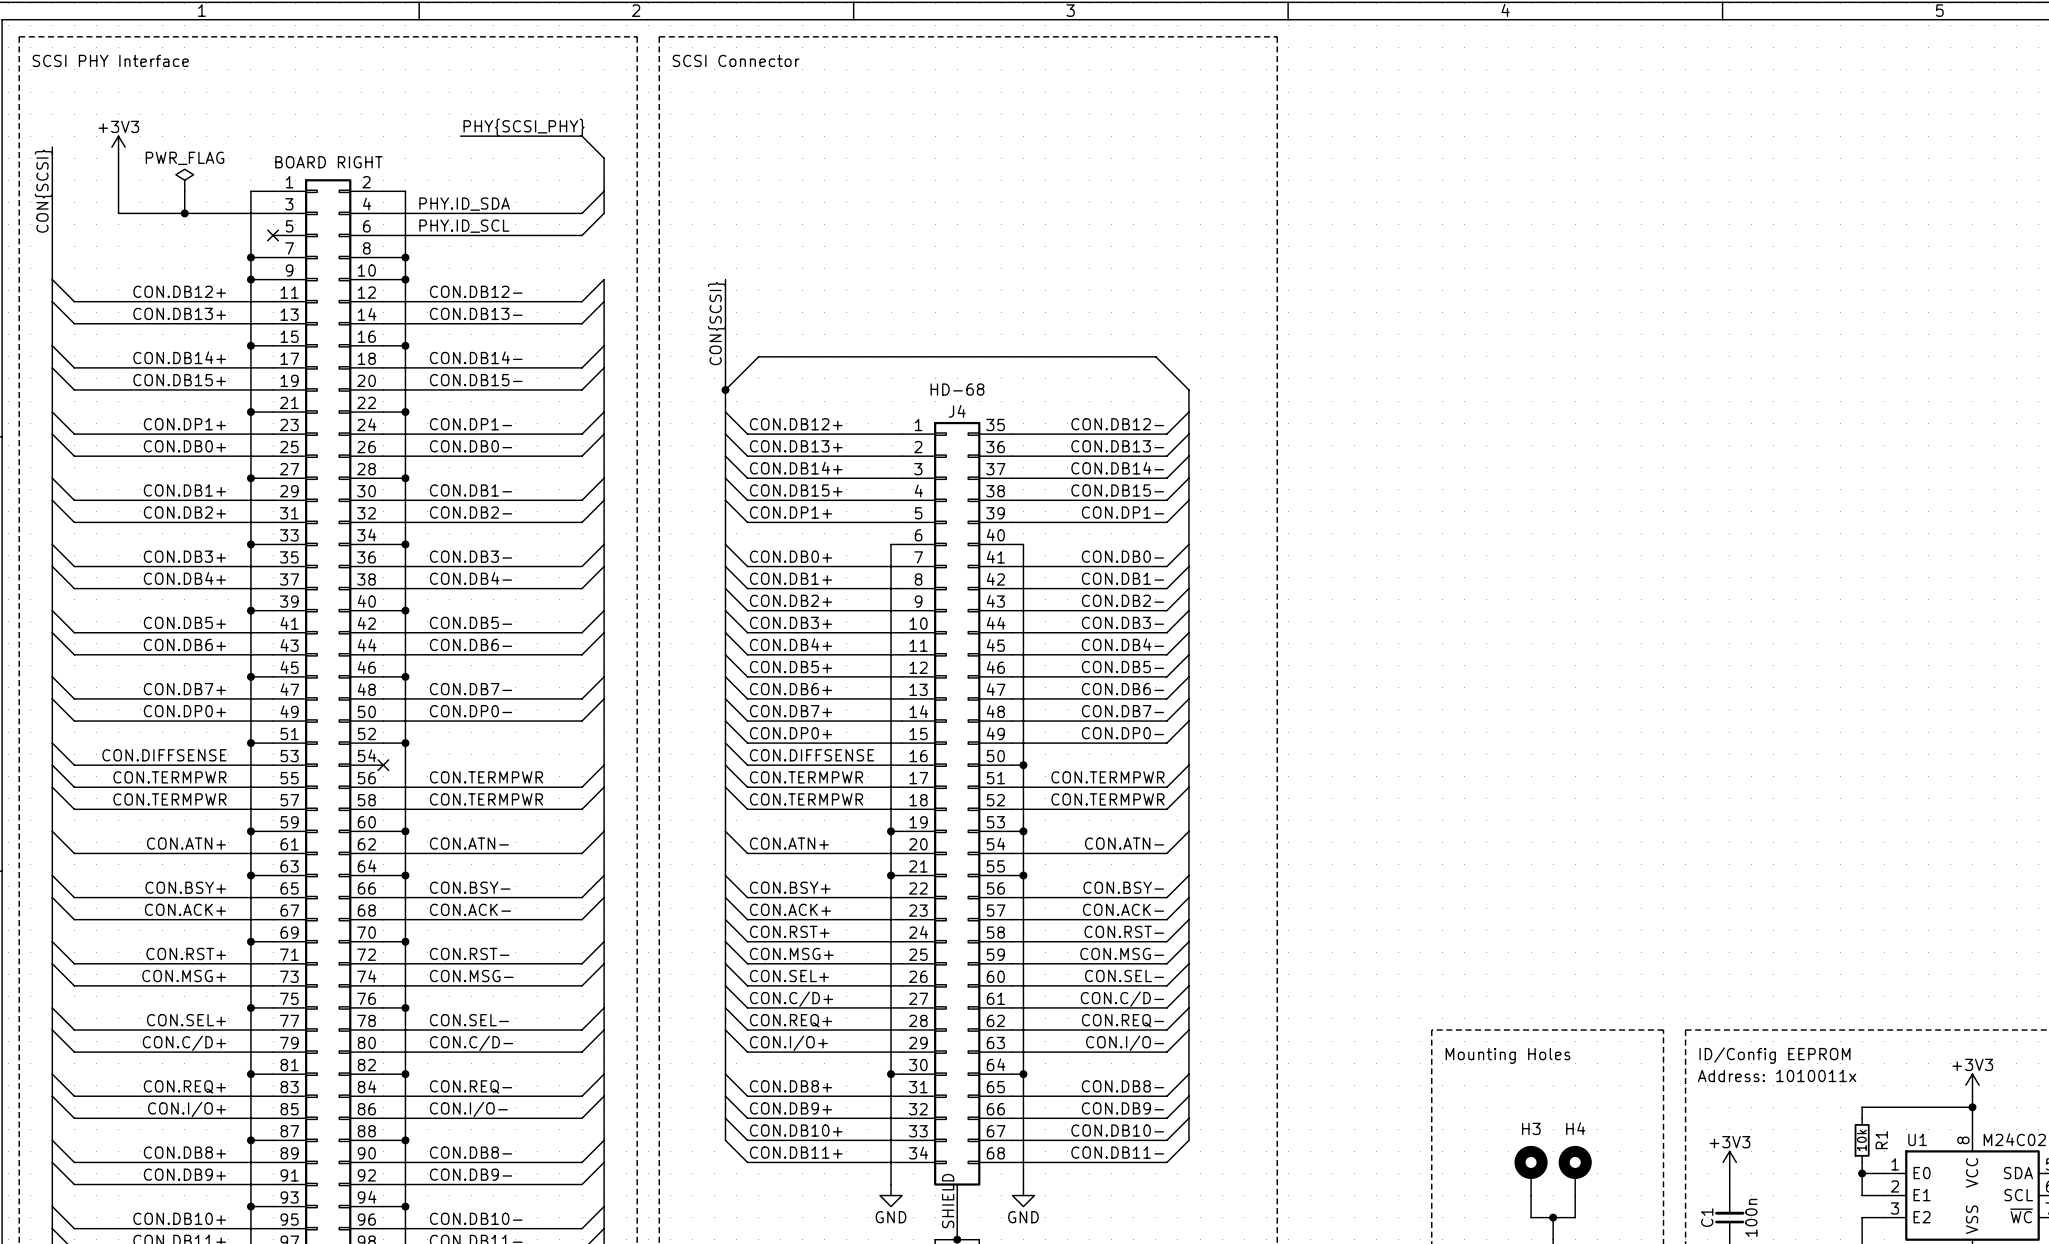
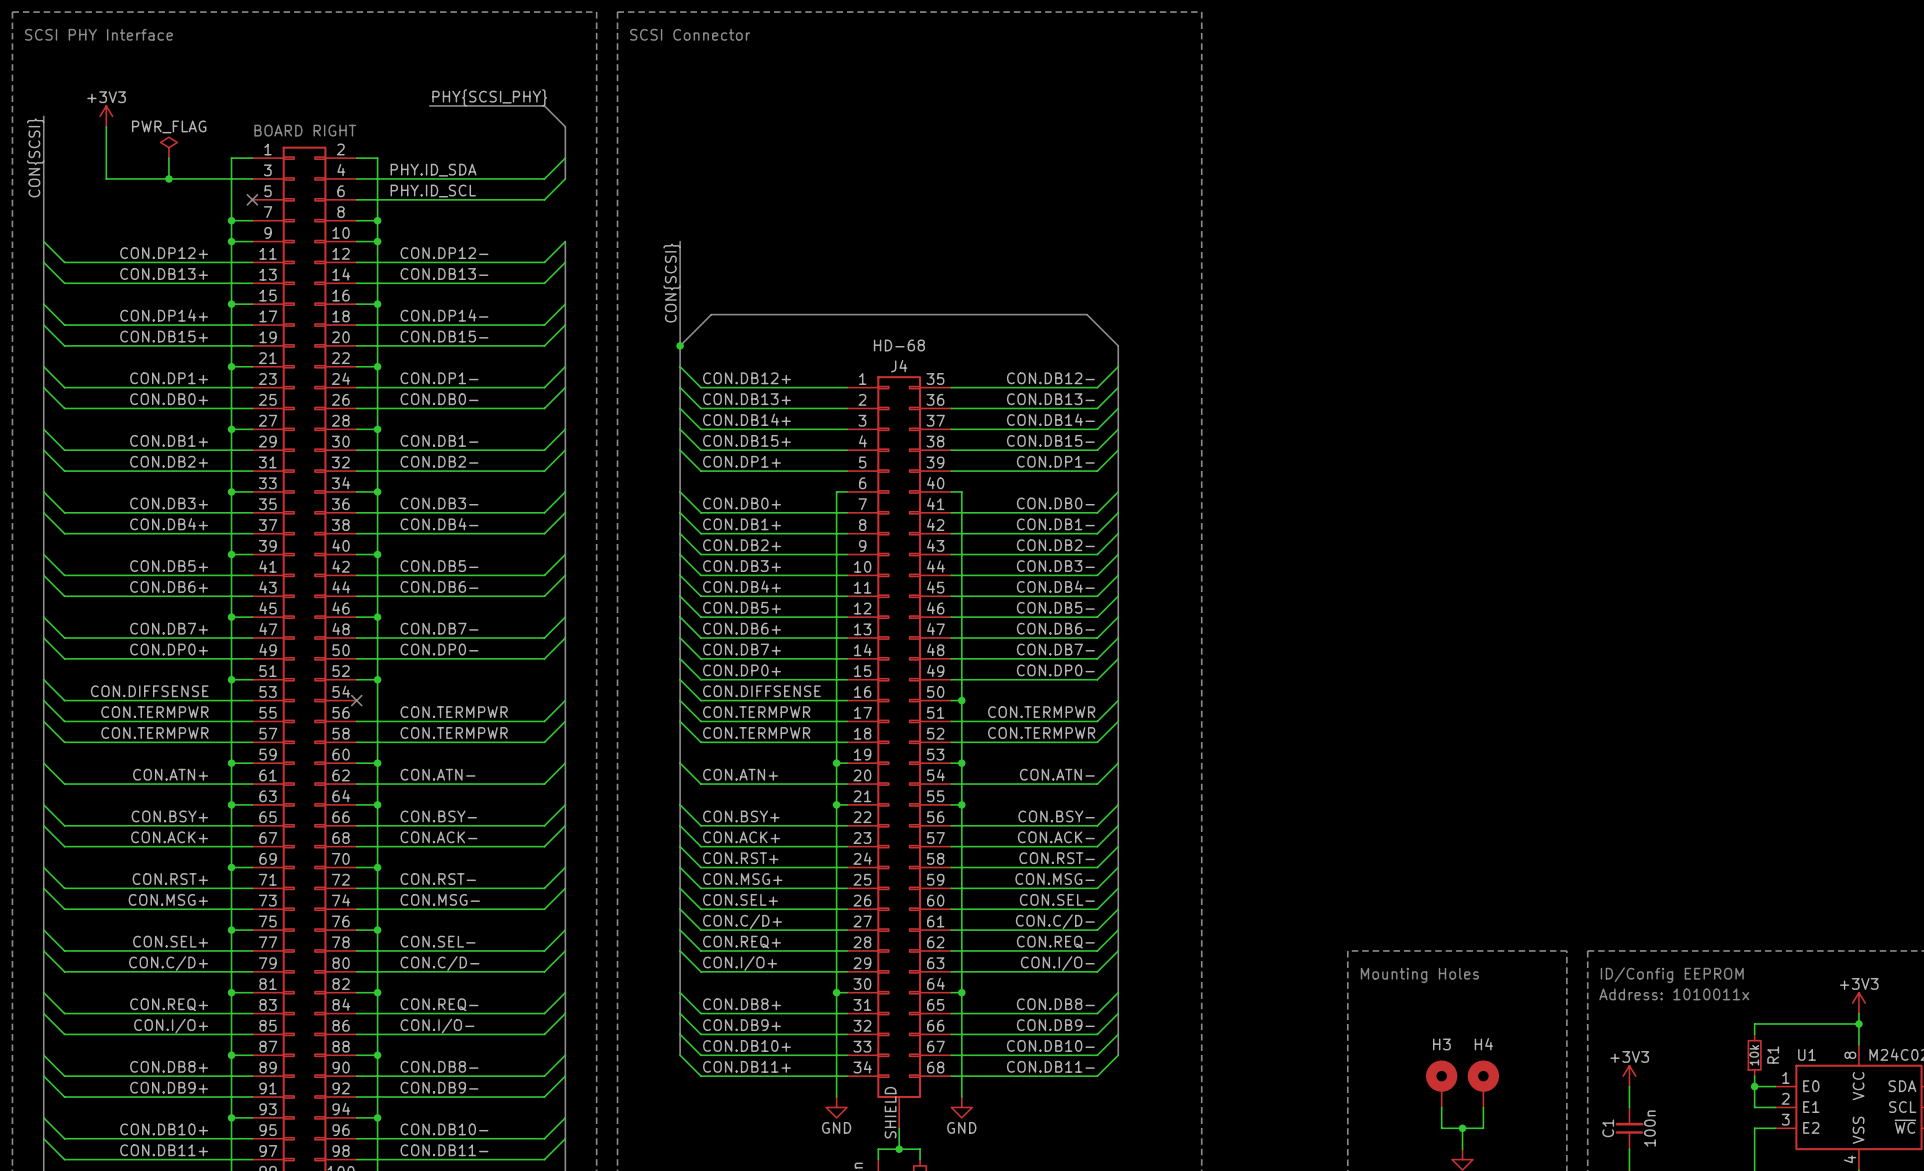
label: CON.DB12+ (179, 291) -> CON.DP12+ (164, 253)
label: CON.DB12- (476, 291) -> CON.DP12- (444, 253)
label: CON.DB14+ (179, 357) -> CON.DP14+ (164, 315)
label: CON.DB14- (476, 357) -> CON.DP14- (444, 315)

